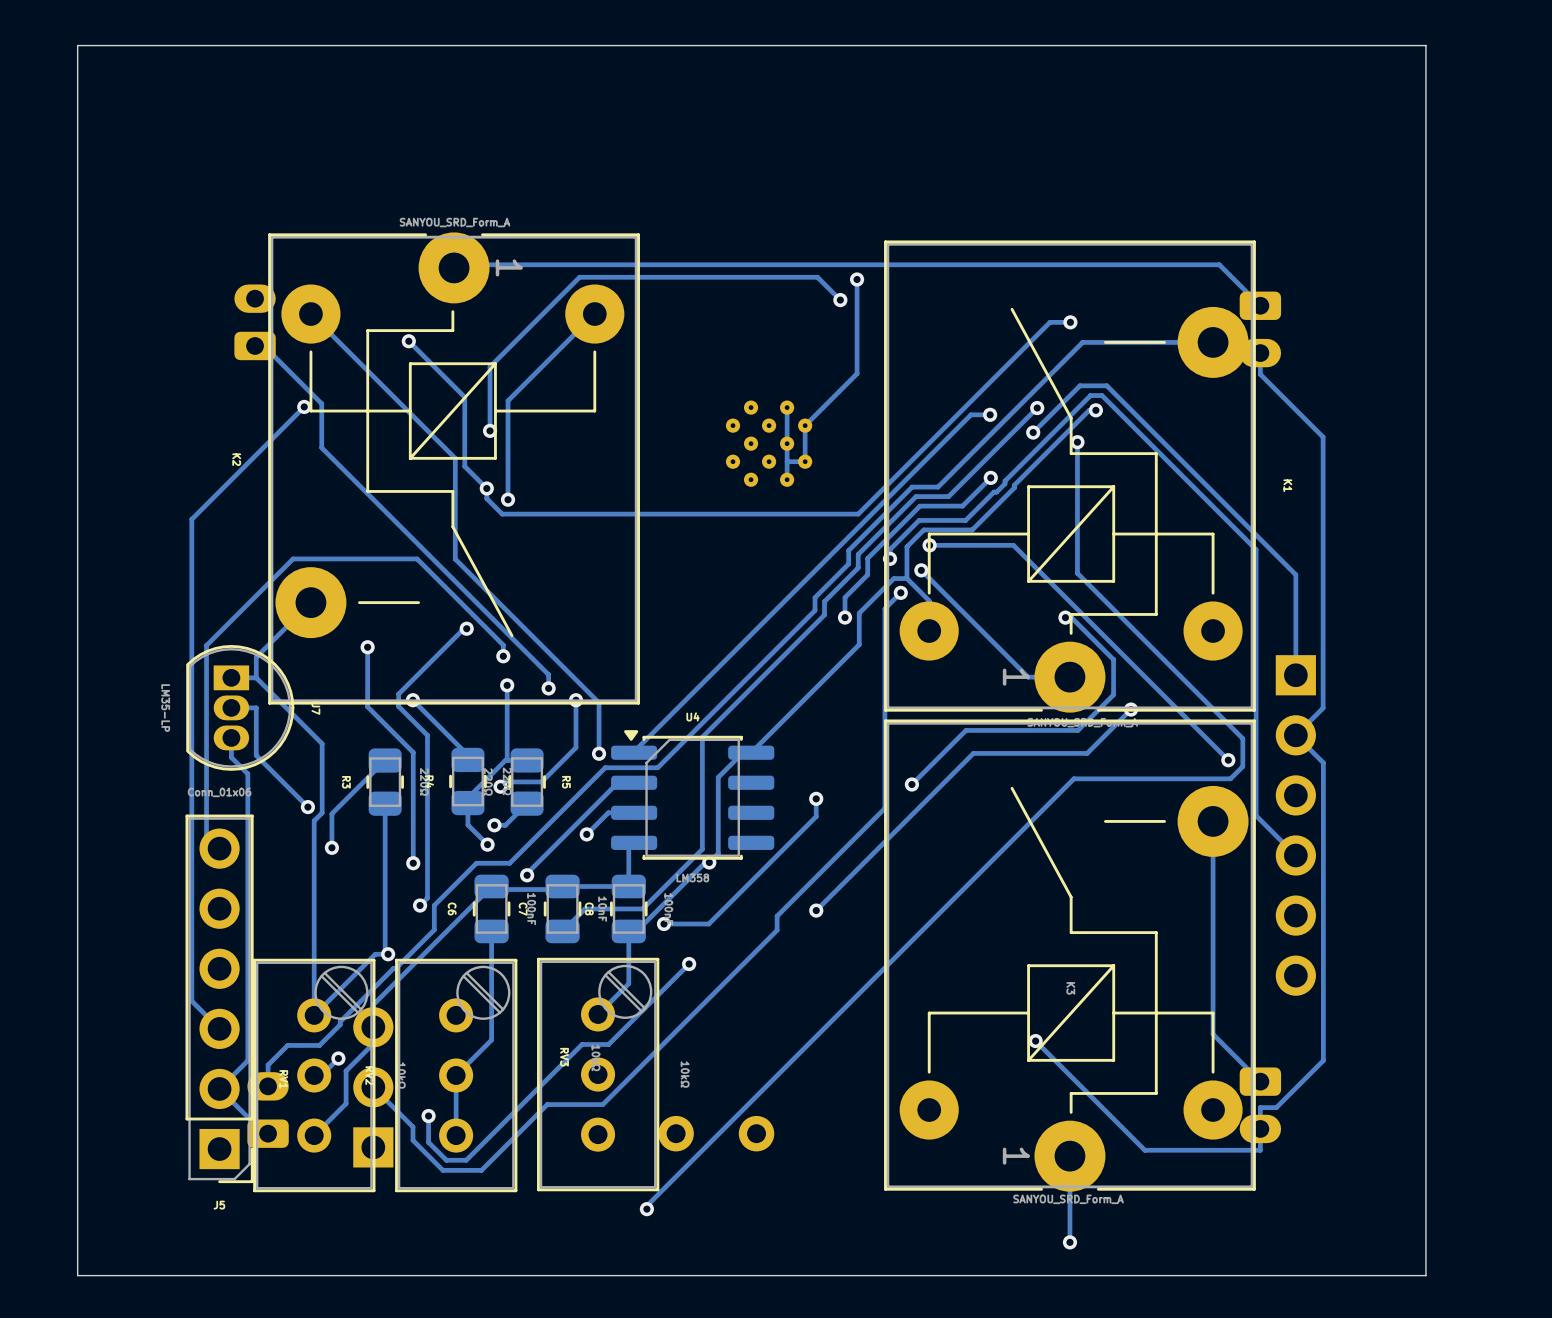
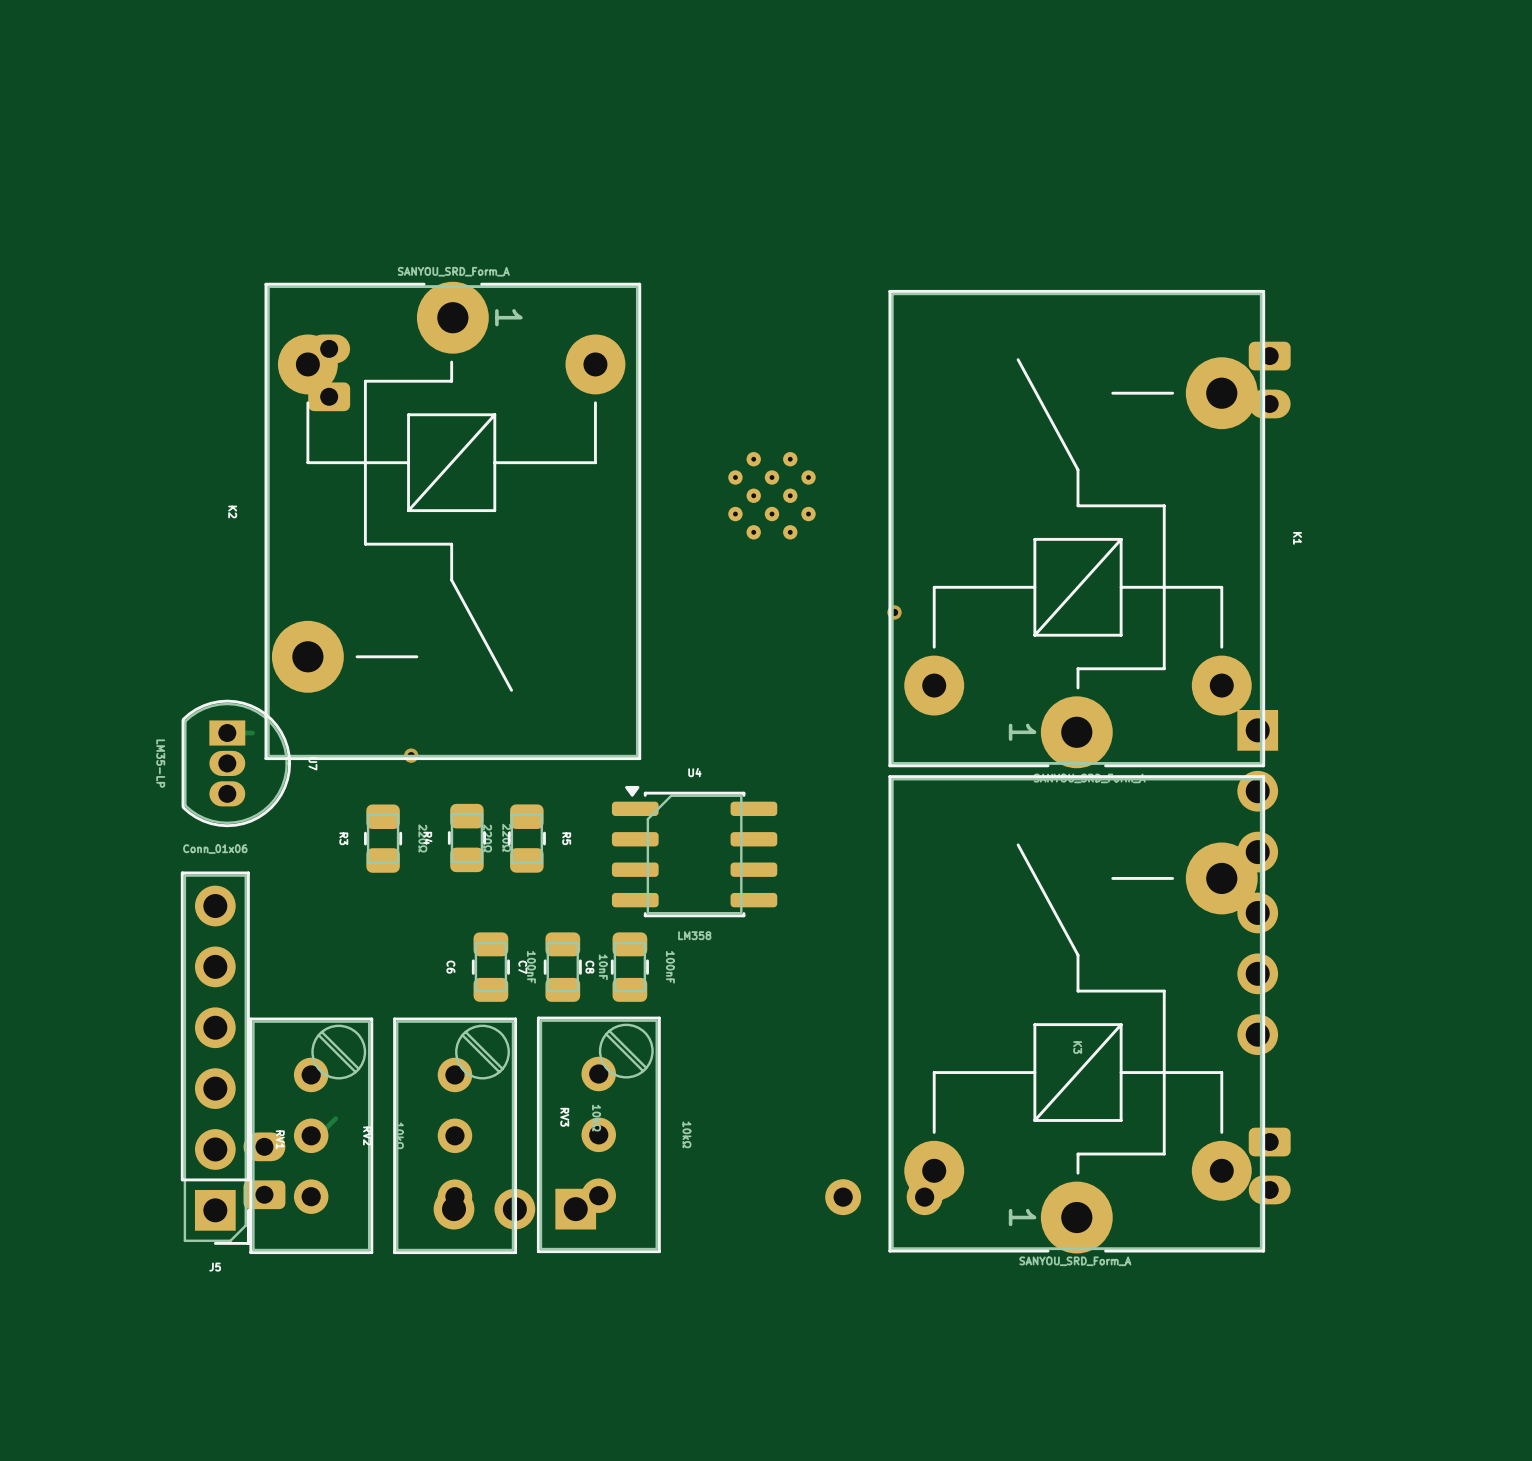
board edge: (1425, 45) (77, 45) (77, 1275) (1425, 1275) (1425, 45) -> none
track: (454, 267) (457, 264) (1219, 264) (1260, 305) -> none
track: (857, 279) (857, 373) (805, 425) (805, 461) (787, 461) -> none
via: (857, 279) -> none
track: (840, 300) (817, 277) (579, 277) (490, 366) (490, 430) -> none
via: (840, 300) -> none
track: (310, 314) (455, 458) (455, 559) (599, 702) (599, 753) -> none
track: (594, 314) (508, 400) (508, 499) -> none
part position: (255, 322) -> (329, 372)
track: (1070, 322) (1050, 322) (858, 514) (502, 514) (486, 498) (486, 488) (464, 466) (464, 397) (408, 341) -> none
via: (1070, 322) -> none
via: (408, 341) -> none
track: (1213, 342) (1082, 342) (938, 487) (912, 487) (848, 550) (848, 563) (815, 597) (815, 610) (657, 767) (605, 767) (509, 863) (476, 863) (434, 905) (434, 929) (340, 1021) (340, 1024) (319, 1045) (287, 1045) (268, 1065) (268, 1086) -> none
track: (255, 345) (263, 345) (321, 403) (321, 447) (548, 674) (548, 688) -> none
track: (1260, 353) (1260, 374) (1323, 437) (1323, 708) (1295, 735) (1323, 762) (1323, 1060) (1276, 1107) (1260, 1107) (1260, 1150) (1144, 1150) (1035, 1041) -> none
track: (304, 406) (191, 519) (191, 1001) (219, 1028) -> none
via: (304, 406) -> none
track: (787, 407) (787, 479) -> none
track: (1037, 408) (948, 496) (916, 496) (858, 554) (858, 567) (824, 601) (824, 615) (702, 737) (702, 849) (642, 908) (585, 908) (562, 931) -> none
via: (1037, 408) -> none
track: (1095, 410) (1089, 410) (972, 529) (923, 529) (906, 546) (906, 578) -> none
via: (1095, 410) -> none
track: (990, 414) (970, 414) (634, 752) -> none
via: (990, 414) -> none
via: (490, 430) -> none
track: (1033, 432) (1079, 385) (1106, 385) (1295, 574) (1295, 675) -> none
via: (1033, 432) -> none
track: (1077, 442) (1077, 573) (1242, 738) (1242, 766) (1230, 778) (1073, 778) (646, 1205) (646, 1209) -> none
via: (1077, 442) -> none
track: (990, 477) (962, 506) (920, 506) (867, 558) (867, 574) (845, 597) (845, 617) -> none
via: (990, 477) -> none
via: (486, 488) -> none
via: (508, 499) -> none
track: (929, 545) (1013, 545) (1228, 760) -> none
via: (929, 545) -> none
track: (890, 558) (890, 549) (919, 520) (965, 520) (993, 492) (996, 492) (1005, 483) (1005, 481) (1090, 395) (1102, 395) (1256, 549) (1256, 815) (1295, 855) -> none
track: (921, 570) (1028, 677) (1069, 677) -> none
via: (921, 570) -> none
track: (906, 578) (929, 600) (929, 631) -> none
track: (906, 578) (893, 578) (859, 613) (859, 644) (751, 752) (742, 752) (718, 777) (718, 853) (709, 862) (705, 862) (636, 931) (628, 931) (628, 983) (598, 1014) -> none
track: (900, 592) (884, 608) (884, 808) (777, 916) (777, 930) (602, 1104) (547, 1104) (481, 1170) (442, 1170) (413, 1140) (413, 1126) (373, 1087) -> none
via: (900, 592) -> none
track: (310, 602) (256, 657) (256, 677) (322, 743) (322, 812) (314, 820) (314, 1015) (375, 954) (388, 954) -> none
via: (845, 617) -> none
track: (1065, 617) (1071, 617) (1113, 659) (1113, 694) (1077, 730) (965, 730) (911, 784) -> none
via: (1065, 617) -> none
track: (466, 628) (463, 628) (398, 694) (398, 706) (427, 735) (427, 898) (420, 905) -> none
via: (466, 628) -> none
track: (367, 647) (367, 706) (413, 752) (413, 863) -> none
via: (367, 647) -> none
track: (503, 656) (503, 645) (417, 558) (293, 558) (206, 645) (206, 835) (219, 848) -> none
via: (503, 656) -> none
track: (507, 685) (507, 760) -> none
via: (507, 685) -> none
via: (548, 688) -> none
track: (412, 700) (467, 755) (467, 759) -> none
track: (576, 700) (576, 747) (541, 781) (505, 781) (500, 786) -> none
via: (576, 700) -> none
track: (231, 707) (256, 707) (256, 755) (307, 807) -> none
track: (1131, 709) (1087, 753) (973, 753) (816, 910) -> none
via: (1131, 709) -> none
track: (231, 737) (231, 757) (247, 773) (247, 1060) (219, 1088) (264, 1133) (268, 1133) -> none
via: (599, 753) -> none
track: (385, 760) (331, 813) (331, 847) -> none
track: (527, 760) (505, 760) (467, 797) (467, 825) (487, 844) -> none
via: (1228, 760) -> none
track: (634, 782) (617, 782) (527, 875) -> none
via: (911, 784) -> none
via: (500, 786) -> none
track: (816, 798) (816, 816) (708, 924) (664, 924) -> none
via: (816, 798) -> none
track: (385, 803) (385, 954) -> none
track: (527, 803) (505, 825) (494, 825) -> none
via: (307, 807) -> none
track: (634, 812) (608, 812) (586, 834) -> none
track: (1213, 821) (1213, 1034) (1260, 1081) -> none
via: (494, 825) -> none
part position: (1295, 825) -> (1257, 882)
via: (586, 834) -> none
track: (634, 842) (628, 848) (628, 886) (562, 886) (559, 889) (494, 889) (491, 886) (373, 1004) (373, 1043) (346, 1070) (346, 1103) (314, 1135) -> none
via: (487, 844) -> none
via: (331, 847) -> none
via: (709, 862) -> none
via: (413, 863) -> none
via: (527, 875) -> none
via: (420, 905) -> none
via: (816, 910) -> none
via: (664, 924) -> none
track: (491, 931) (491, 1040) (456, 1075) (456, 1135) -> none
via: (388, 954) -> none
track: (689, 964) (608, 1044) (582, 1044) (466, 1160) (446, 1160) (428, 1142) (428, 1116) -> none
via: (689, 964) -> none
via: (1035, 1041) -> none
via: (338, 1058) -> none
part rotation: 0° (373, 1087) -> 90° counterclockwise (514, 1209)
part position: (373, 1087) -> (514, 1209)
via: (428, 1116) -> none
part position: (716, 1133) -> (883, 1197)
track: (1069, 1156) (1069, 1242) -> none
via: (646, 1209) -> none
via: (1069, 1242) -> none

